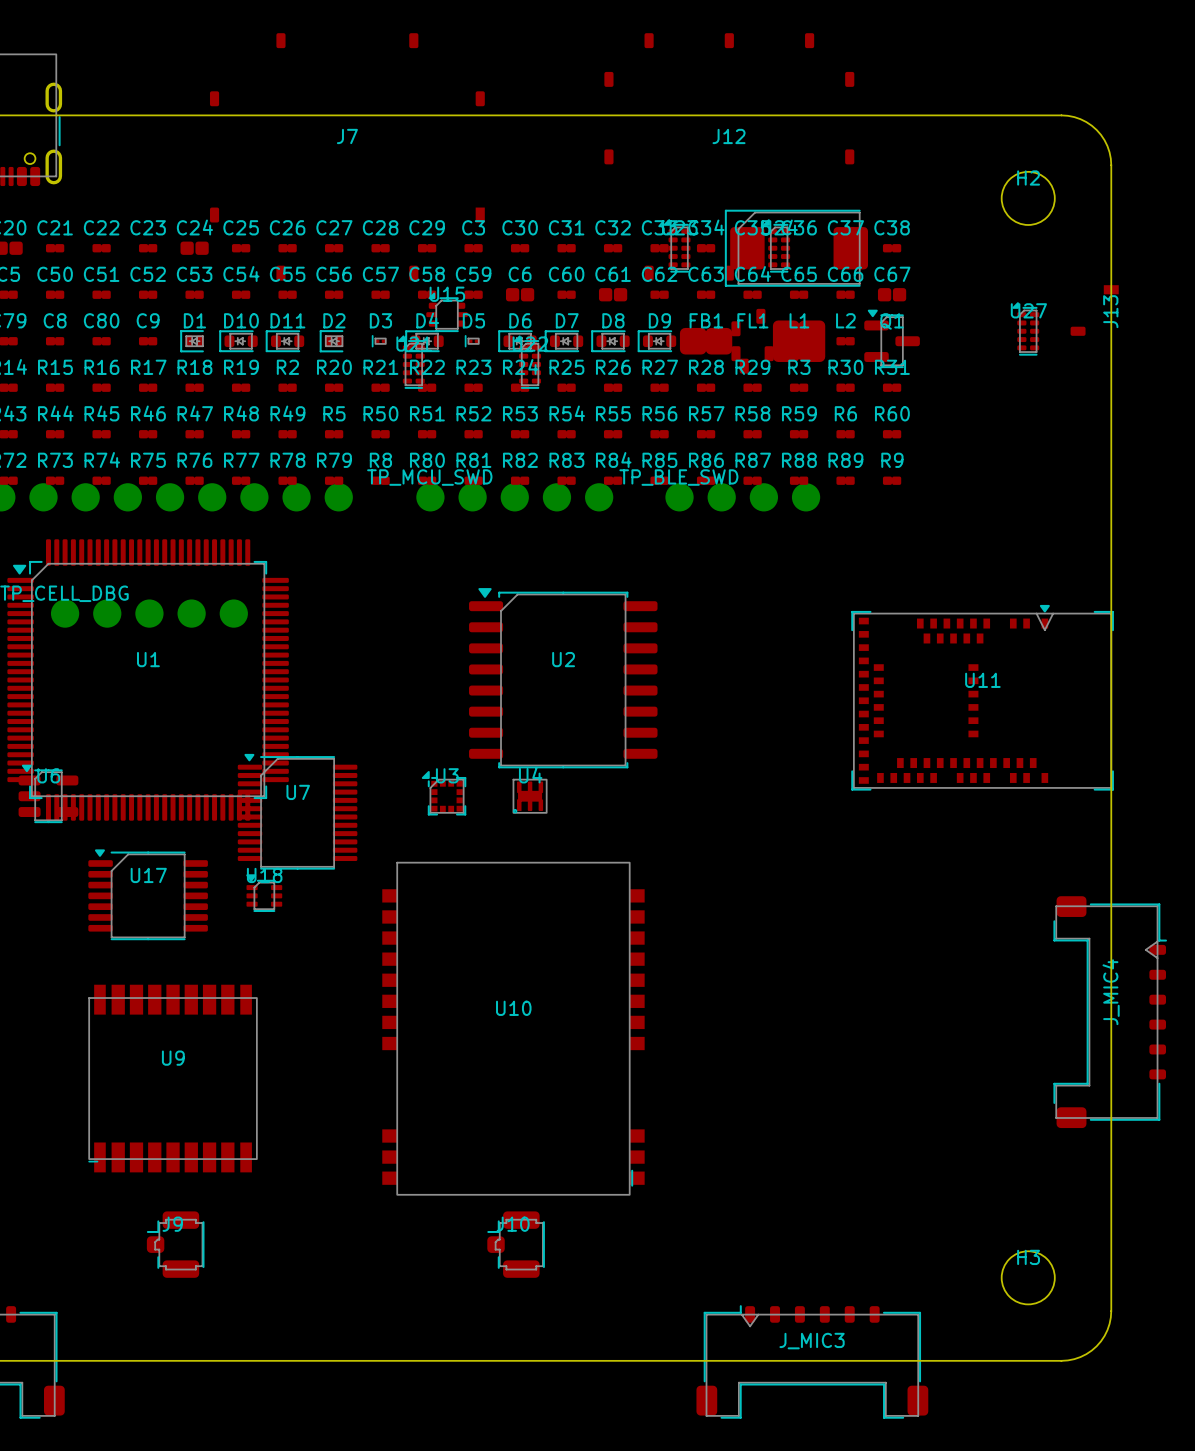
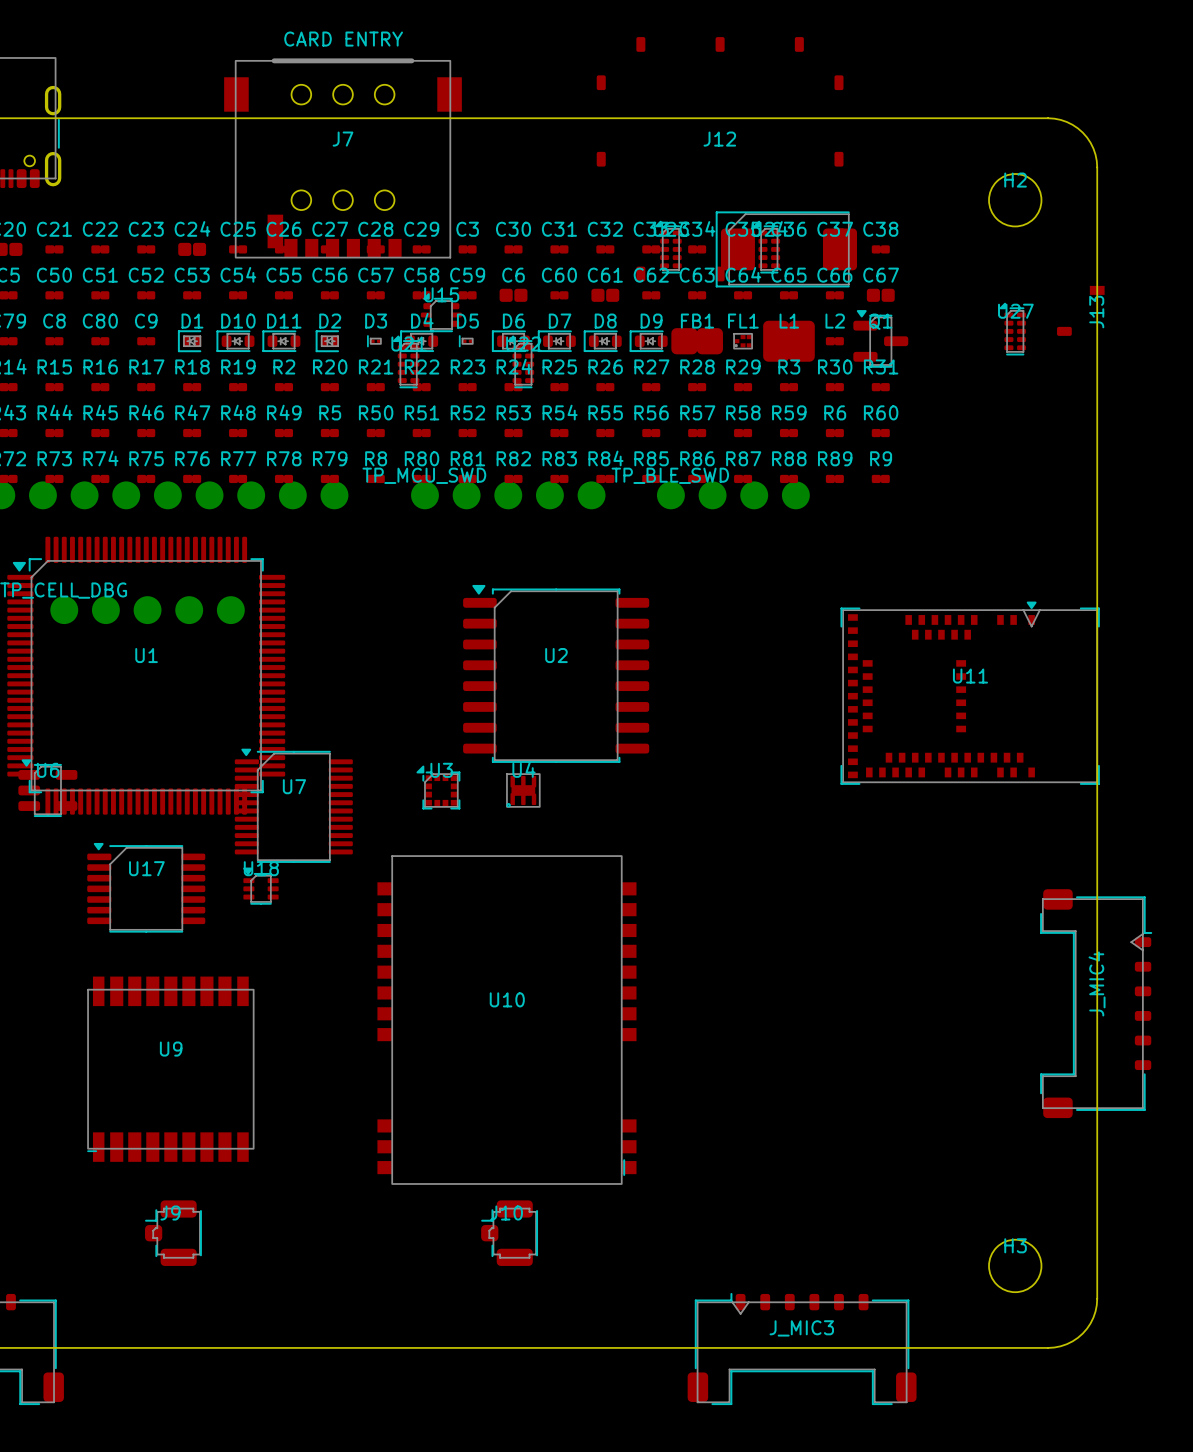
J7 footprint: [209, 33, 485, 281] -> [224, 58, 462, 259]
FL1 footprint: [731, 308, 774, 374] -> [733, 333, 753, 350]

